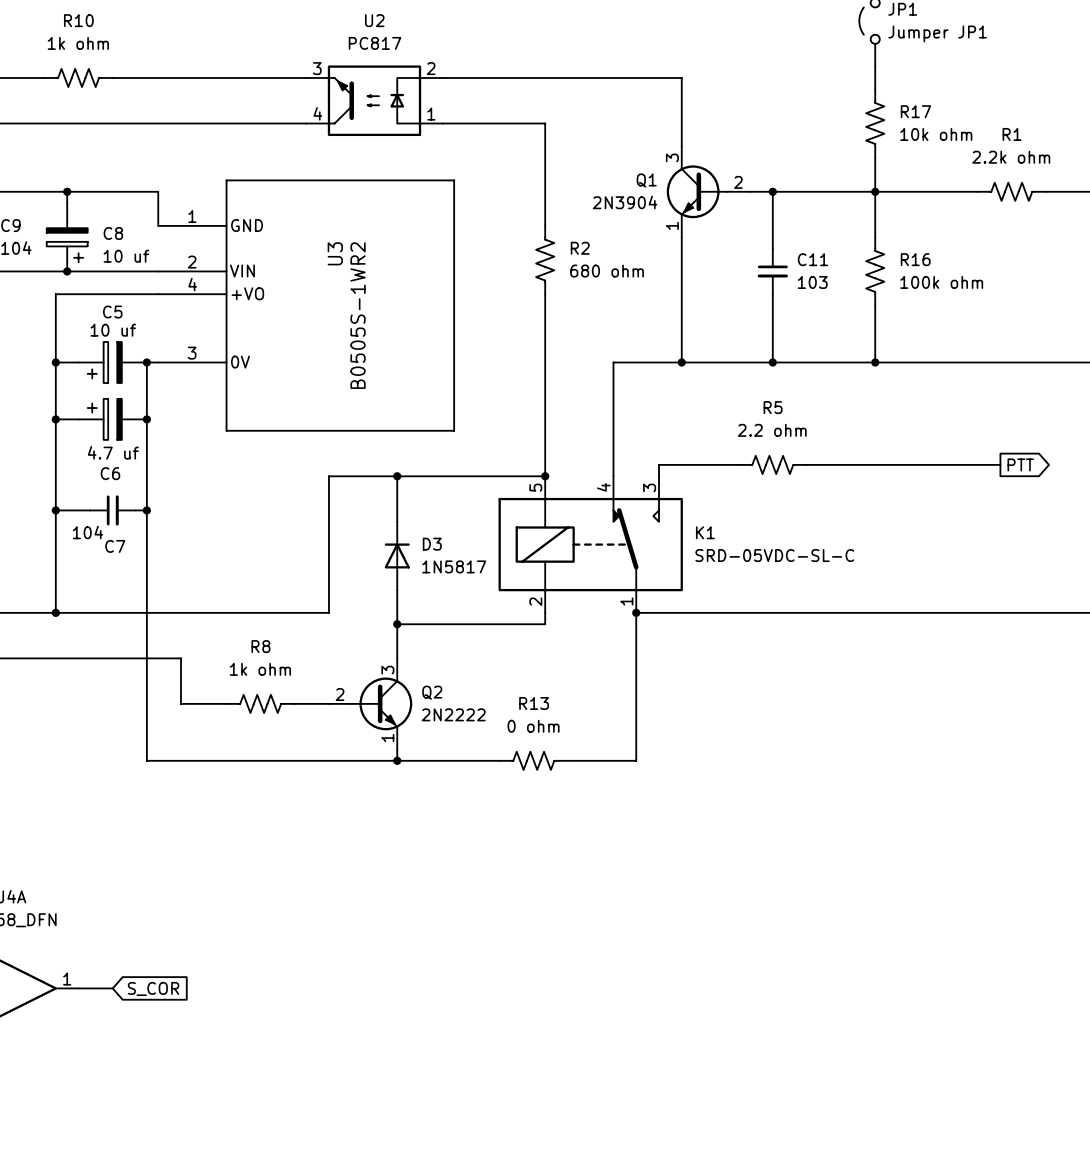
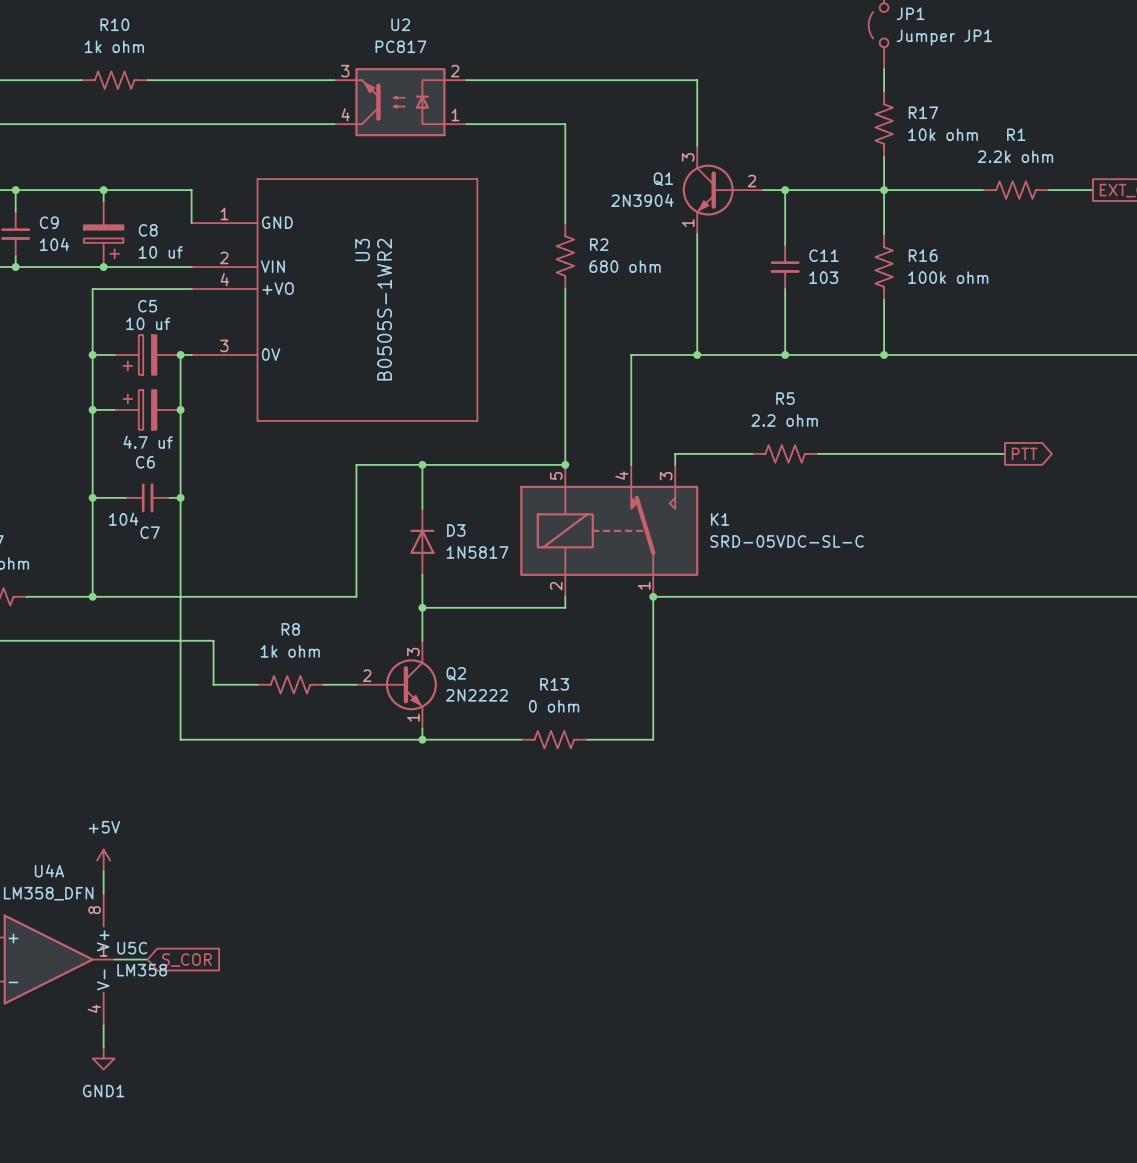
power symbol: none -> +5V (103, 860)
wire: none -> (103, 871) (103, 893)
U5C: none -> LM358 (103, 959)
wire: none -> (103, 1025) (103, 1047)
power symbol: none -> GND1 (103, 1058)

